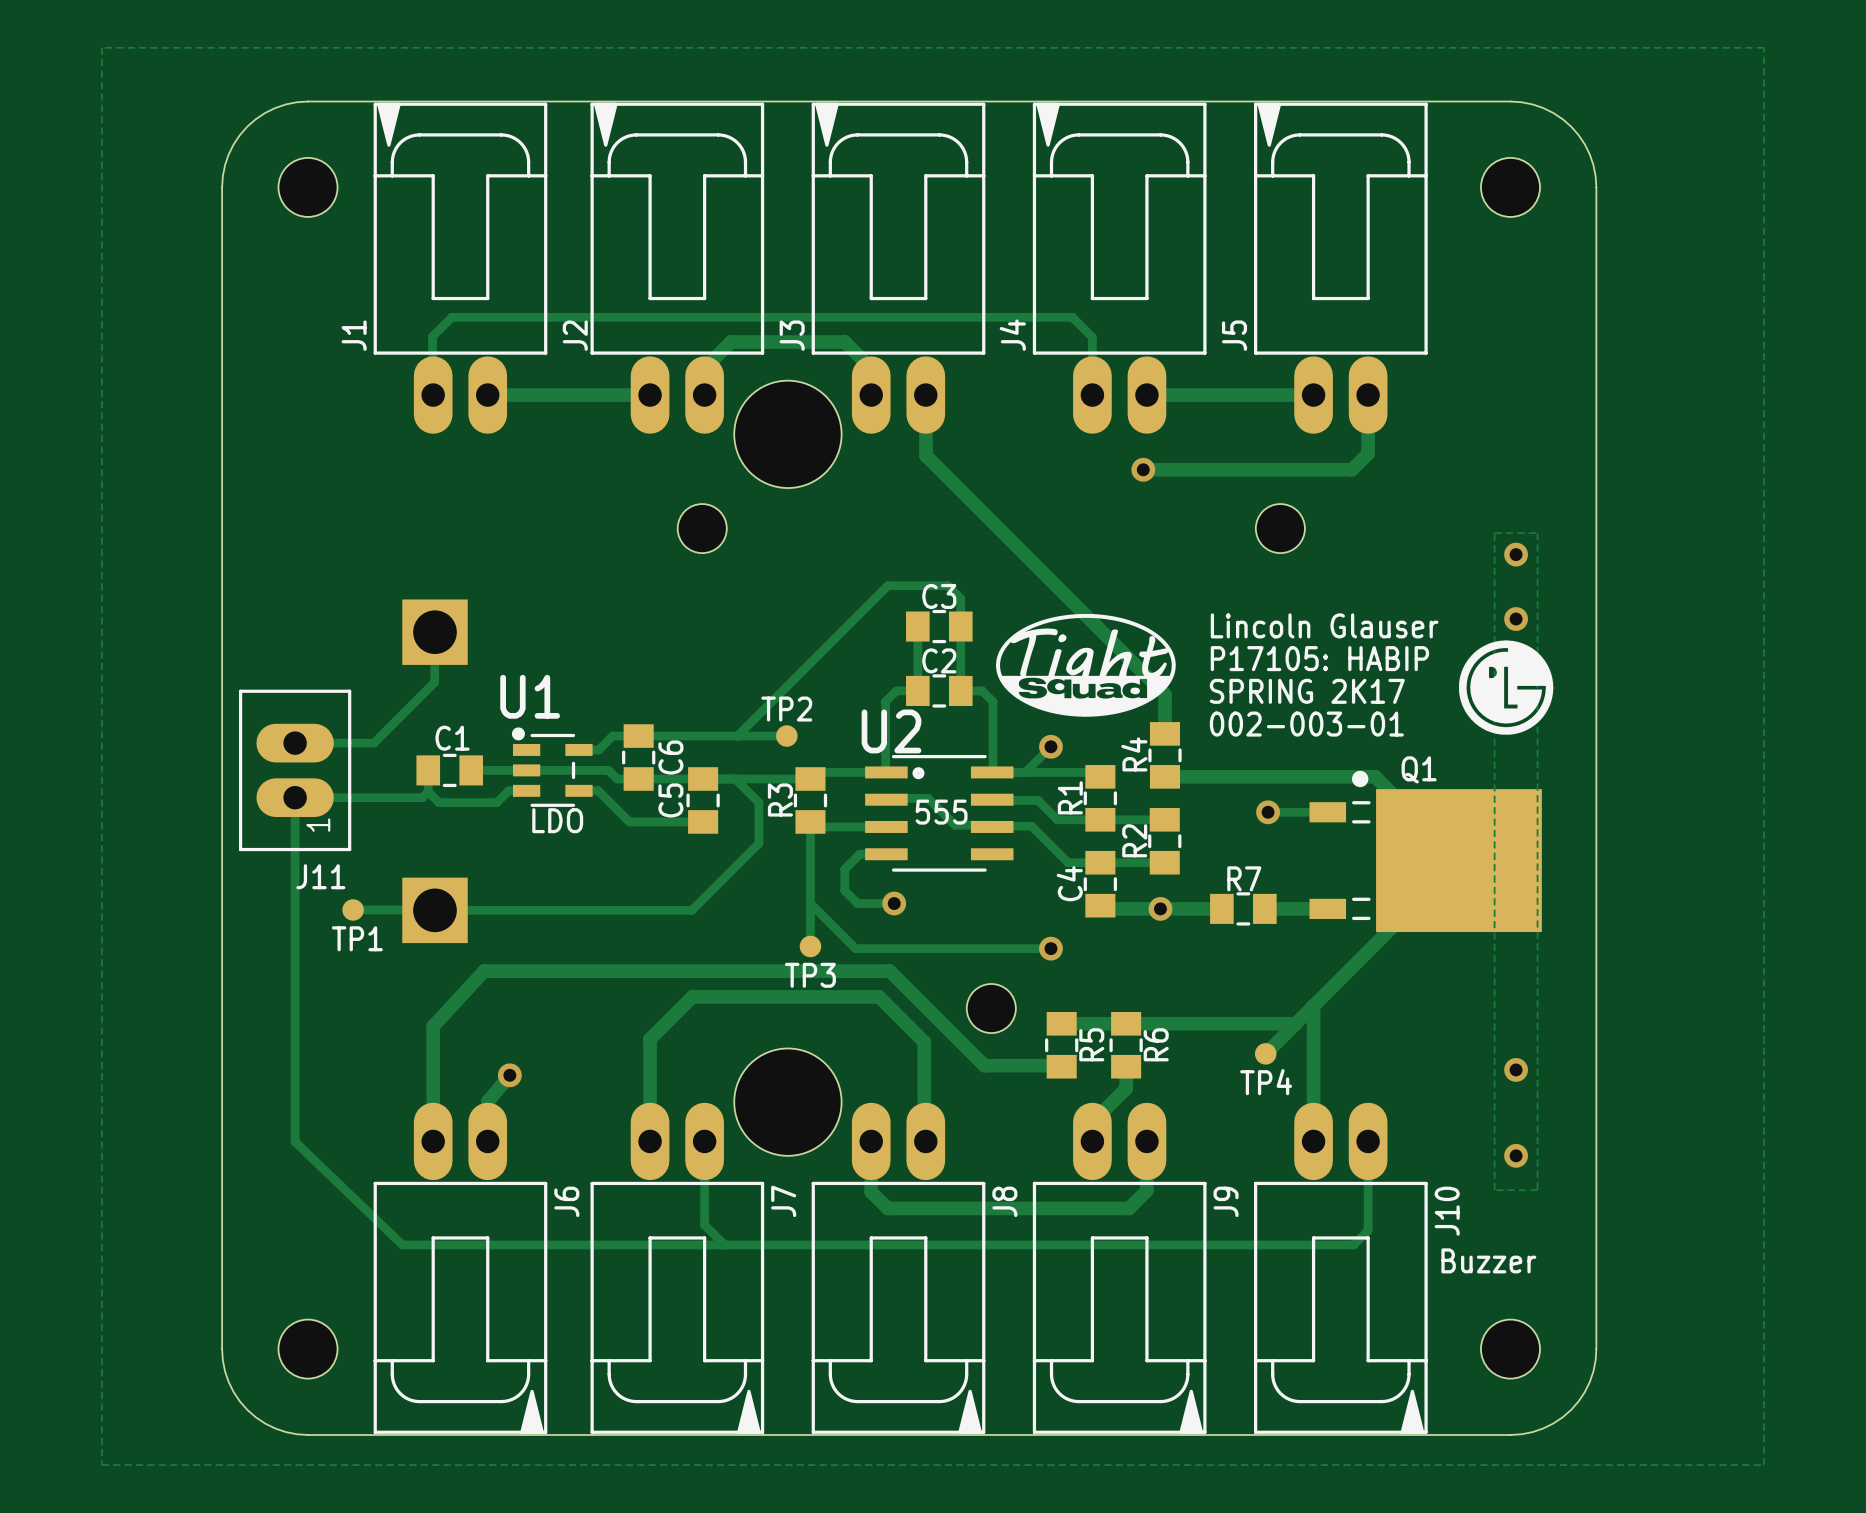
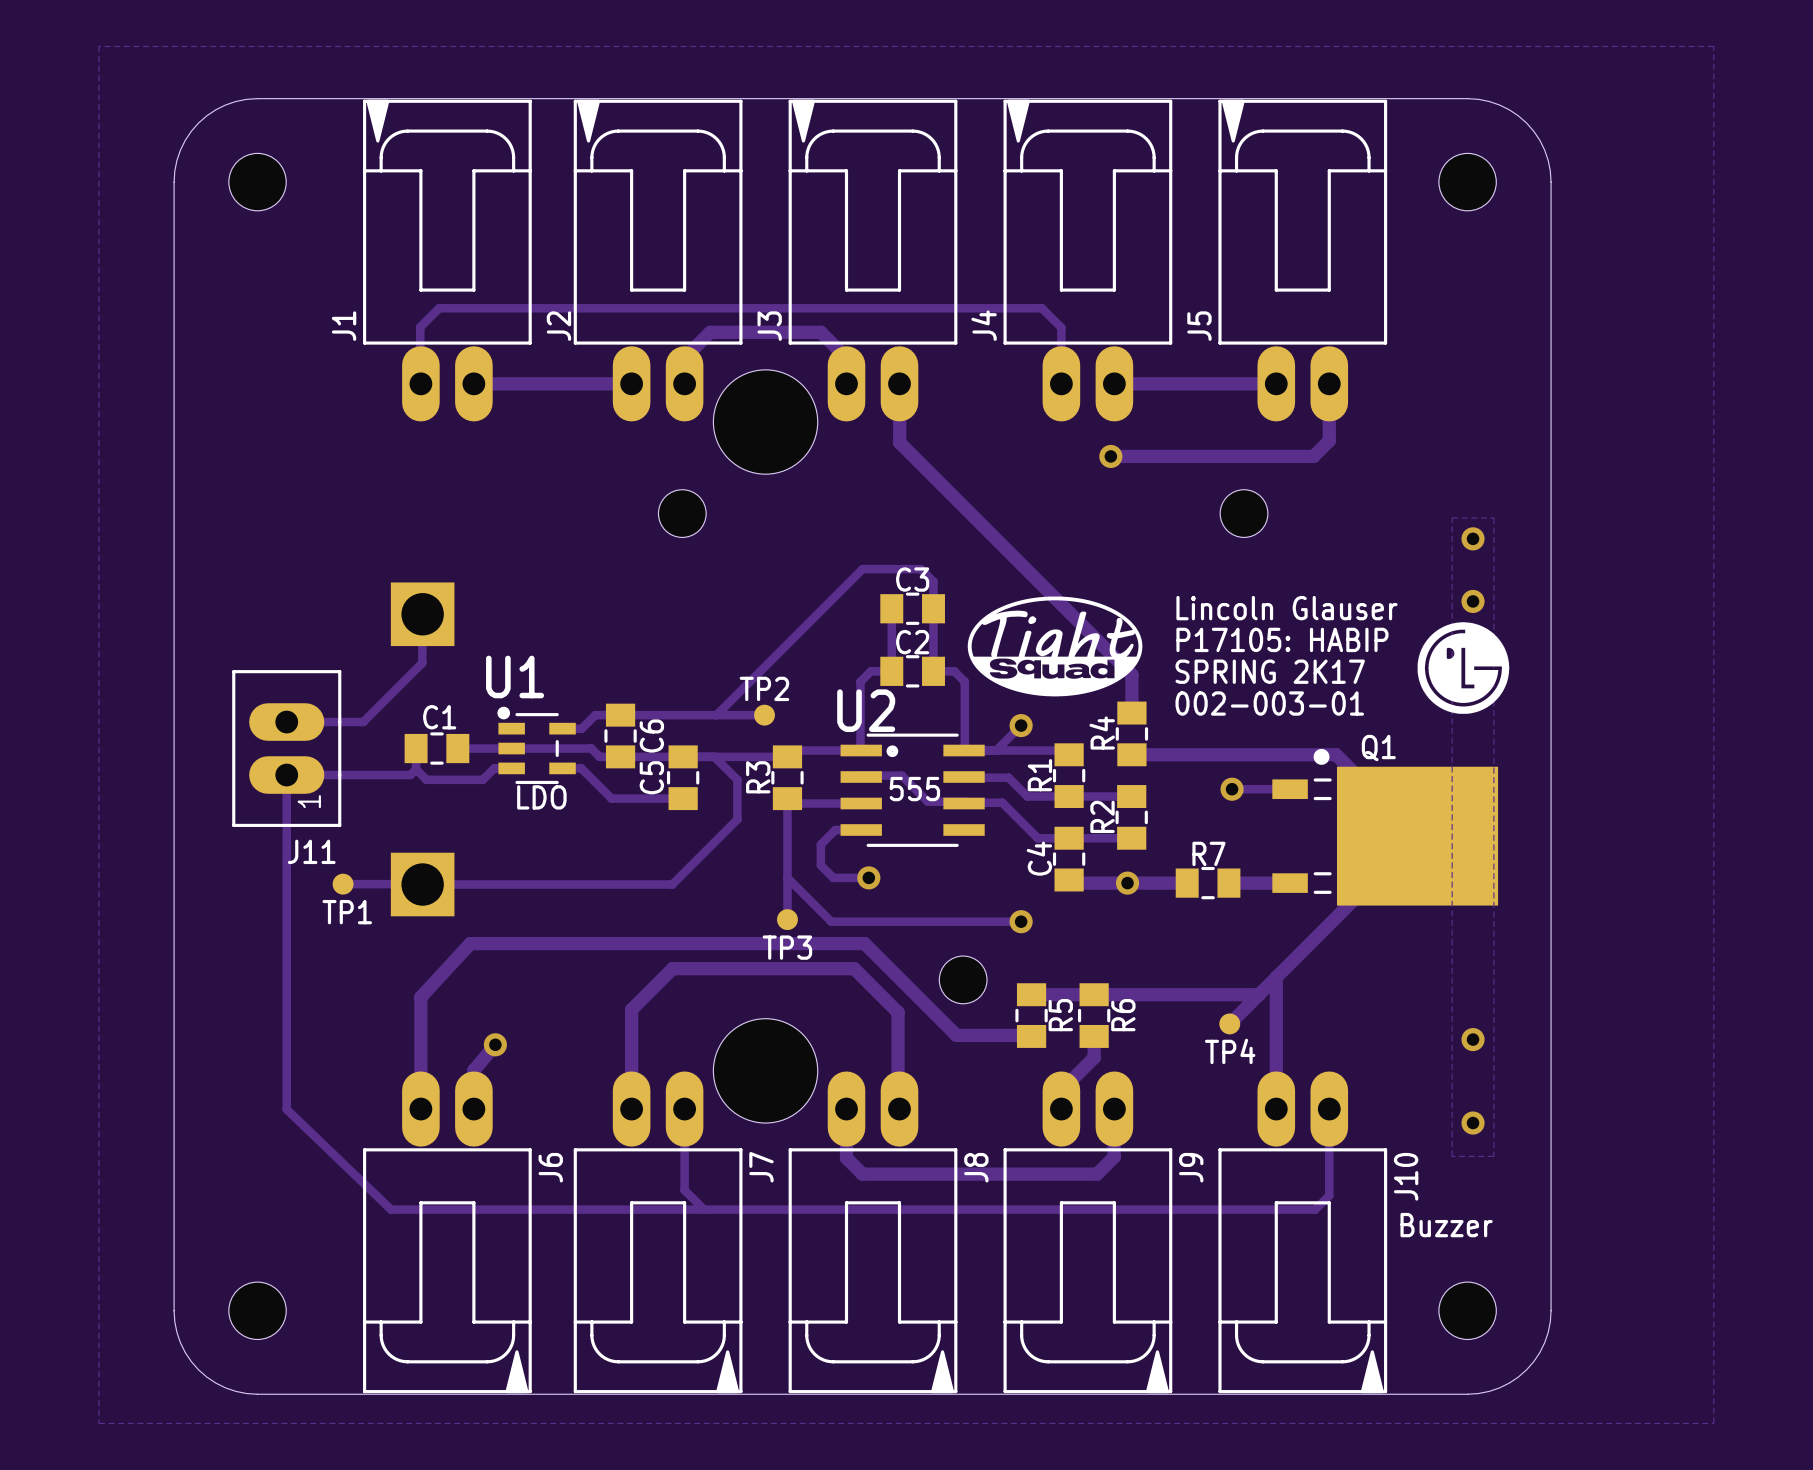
board edge: (308, 101) (275, 108) (247, 126) (228, 154) (222, 187) (222, 1360) (233, 1392) (247, 1409) (275, 1428) (308, 1434) -> (299, 98) (246, 99) (215, 109) (198, 123) (185, 140) (176, 160) (174, 182) (174, 1321) (185, 1352) (198, 1369) (215, 1383) (246, 1393) (299, 1394)
part position: (308, 187) -> (257, 182)
part position: (308, 1349) -> (257, 1310)

